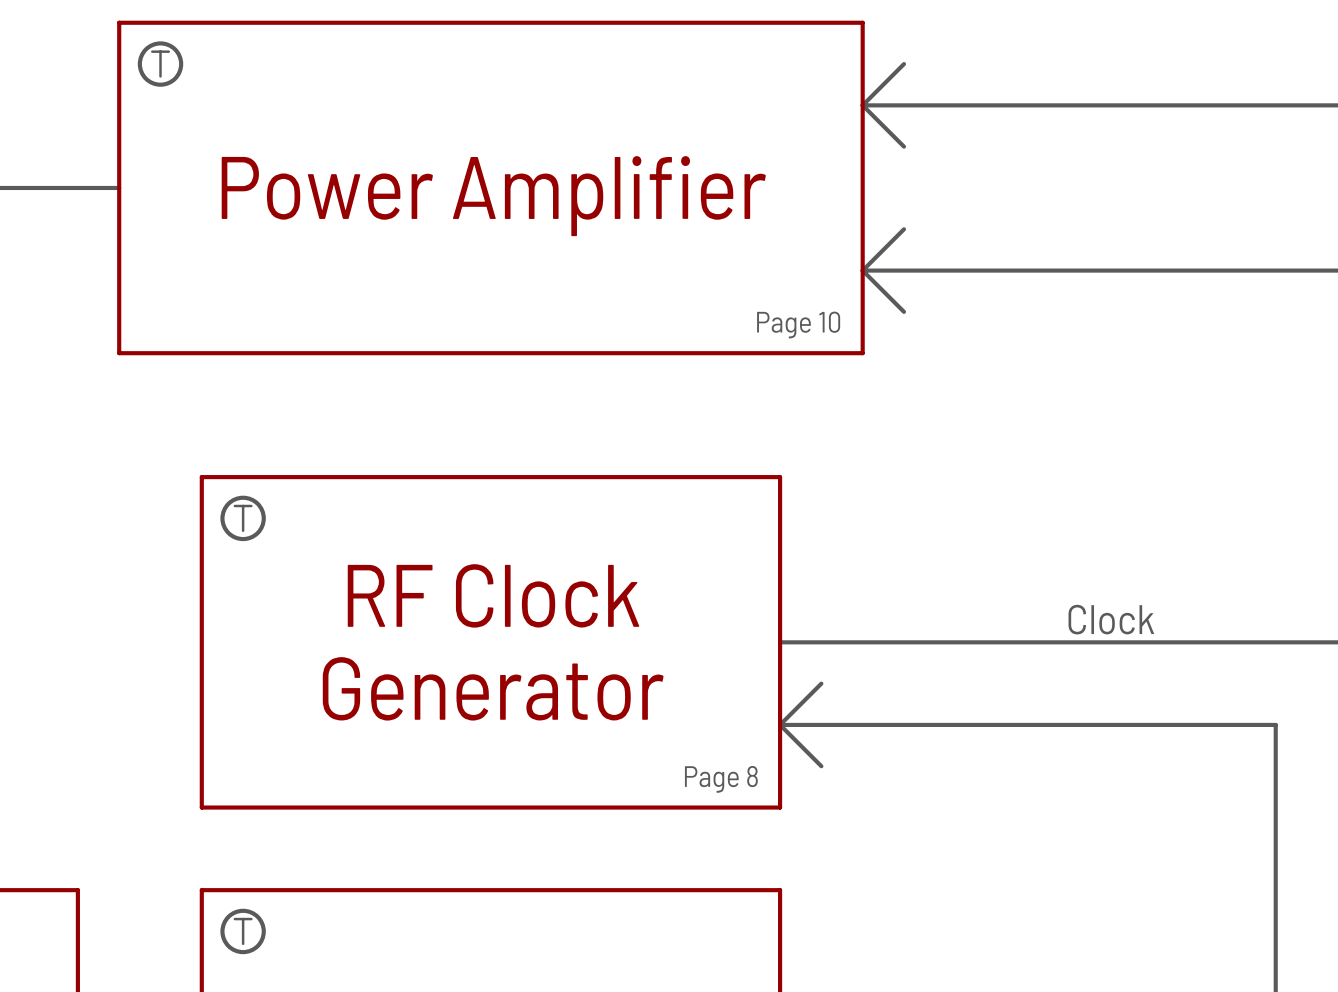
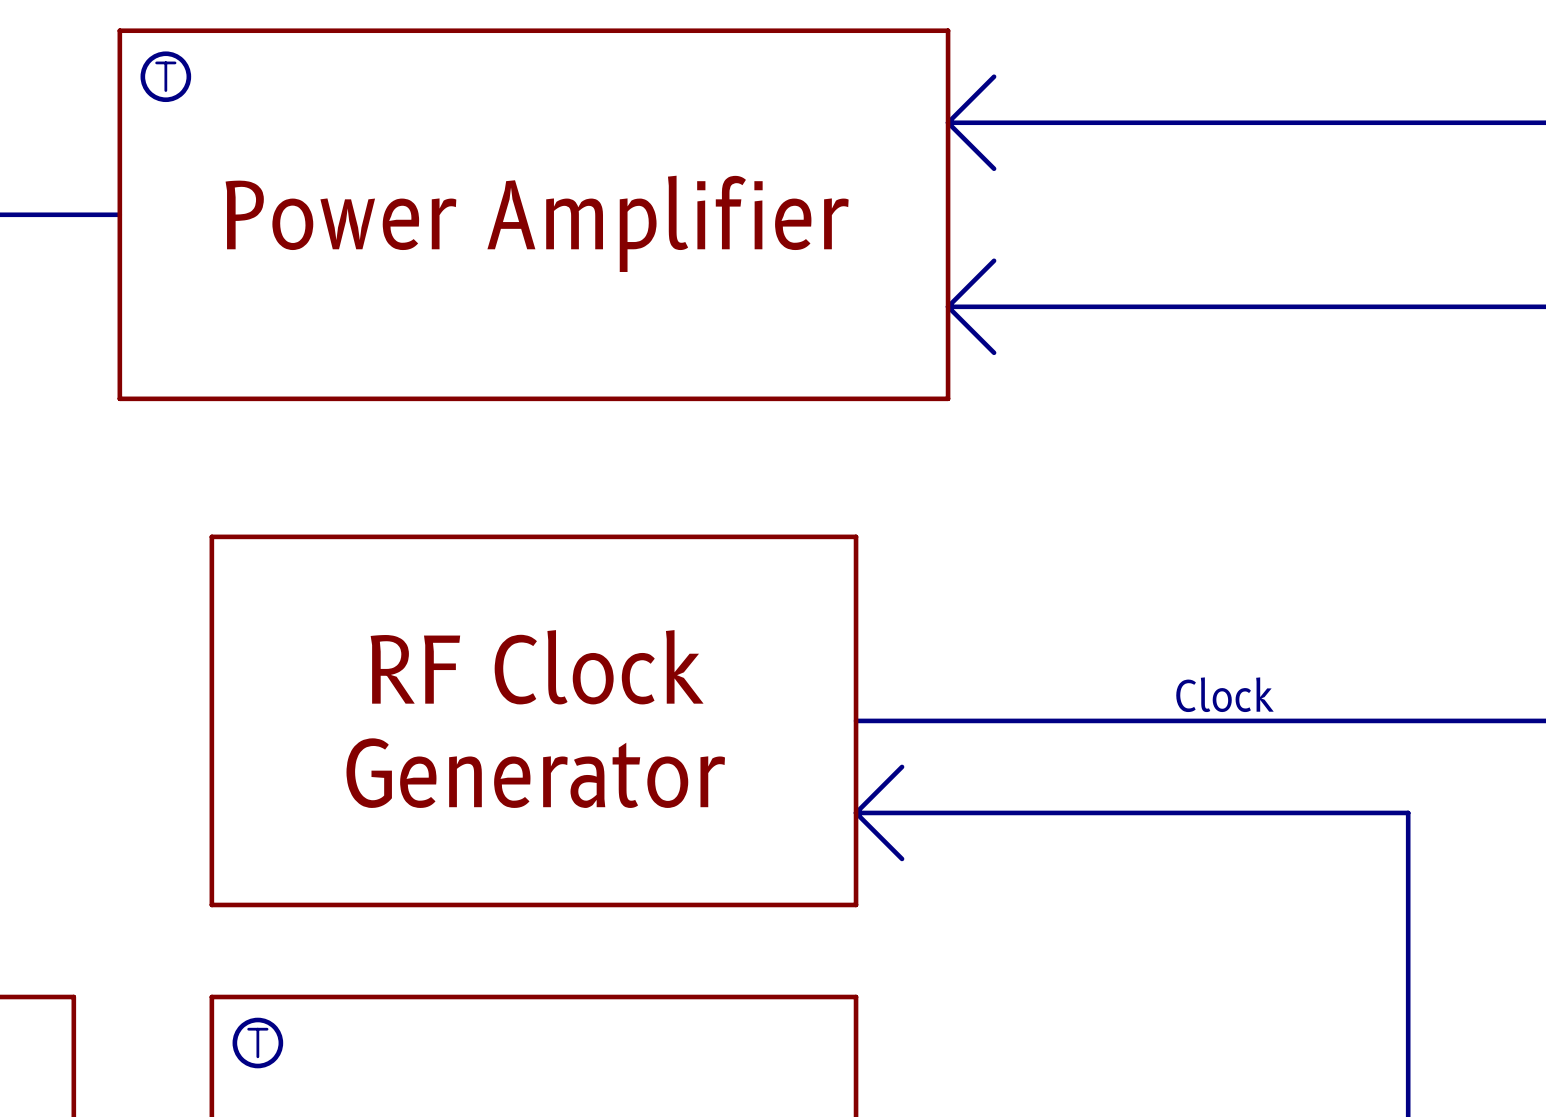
text: Page 10 (798, 325) -> none
part: (243, 518) -> none
text: Page 8 (721, 779) -> none

